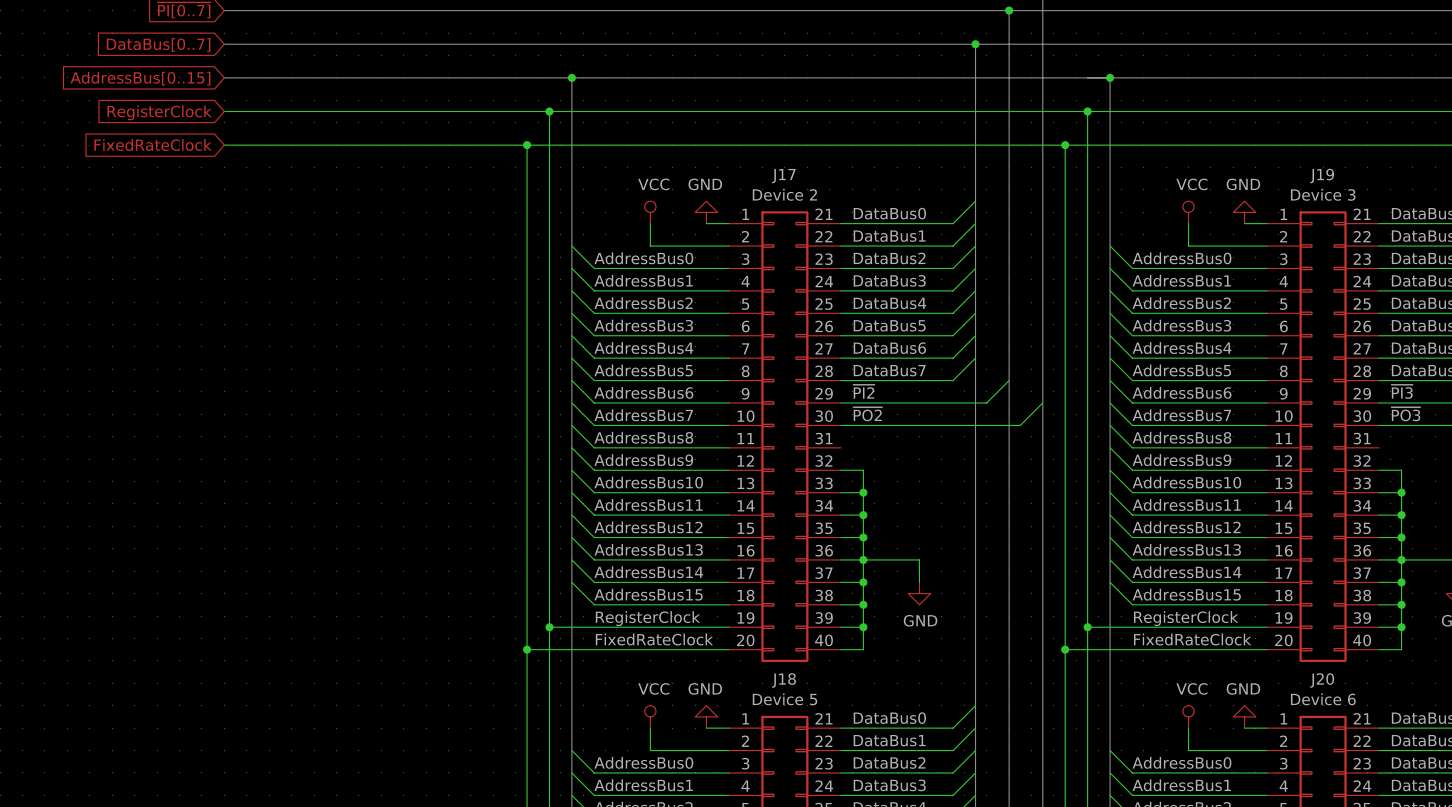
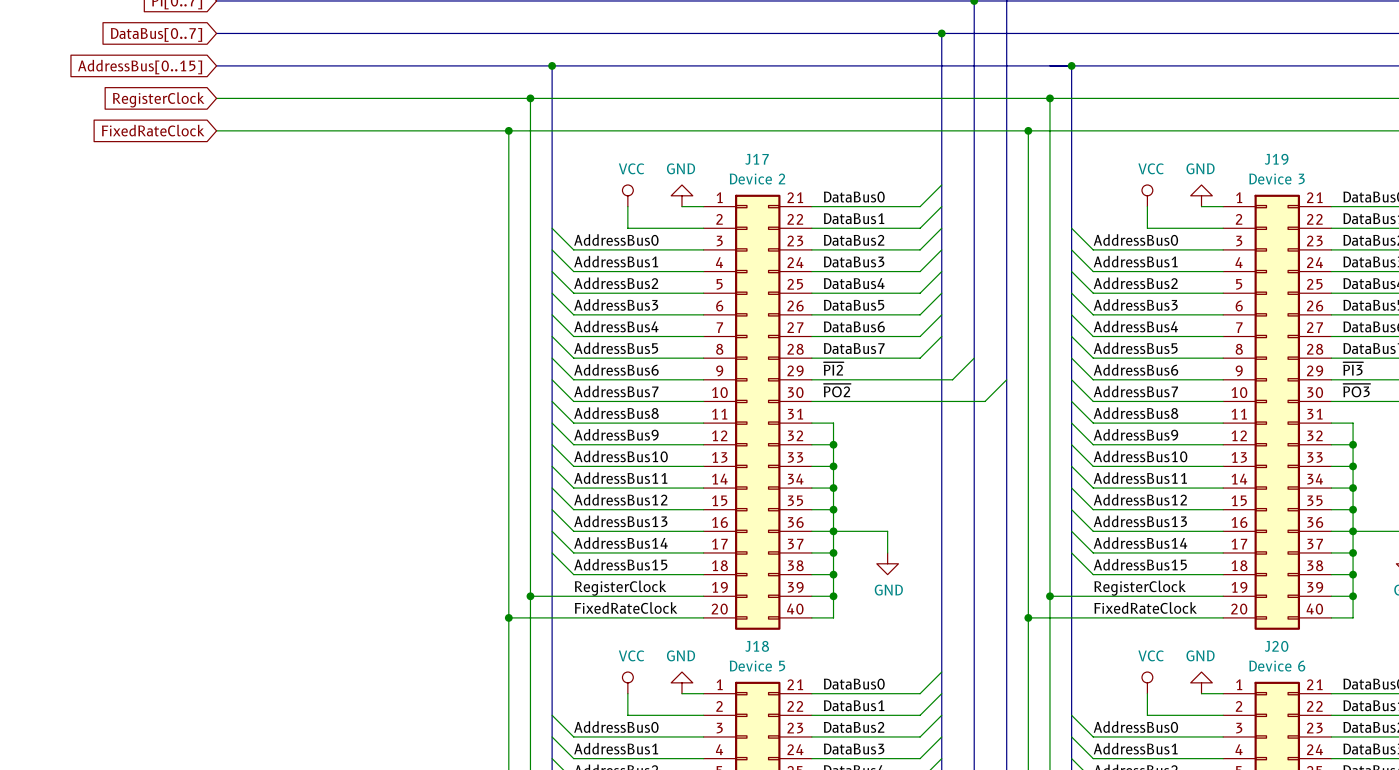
wire: none -> (811, 423) (833, 423) (833, 444)
wire: none -> (1331, 423) (1353, 423) (1353, 444)
junction: none -> (833, 444)
junction: none -> (1353, 444)

